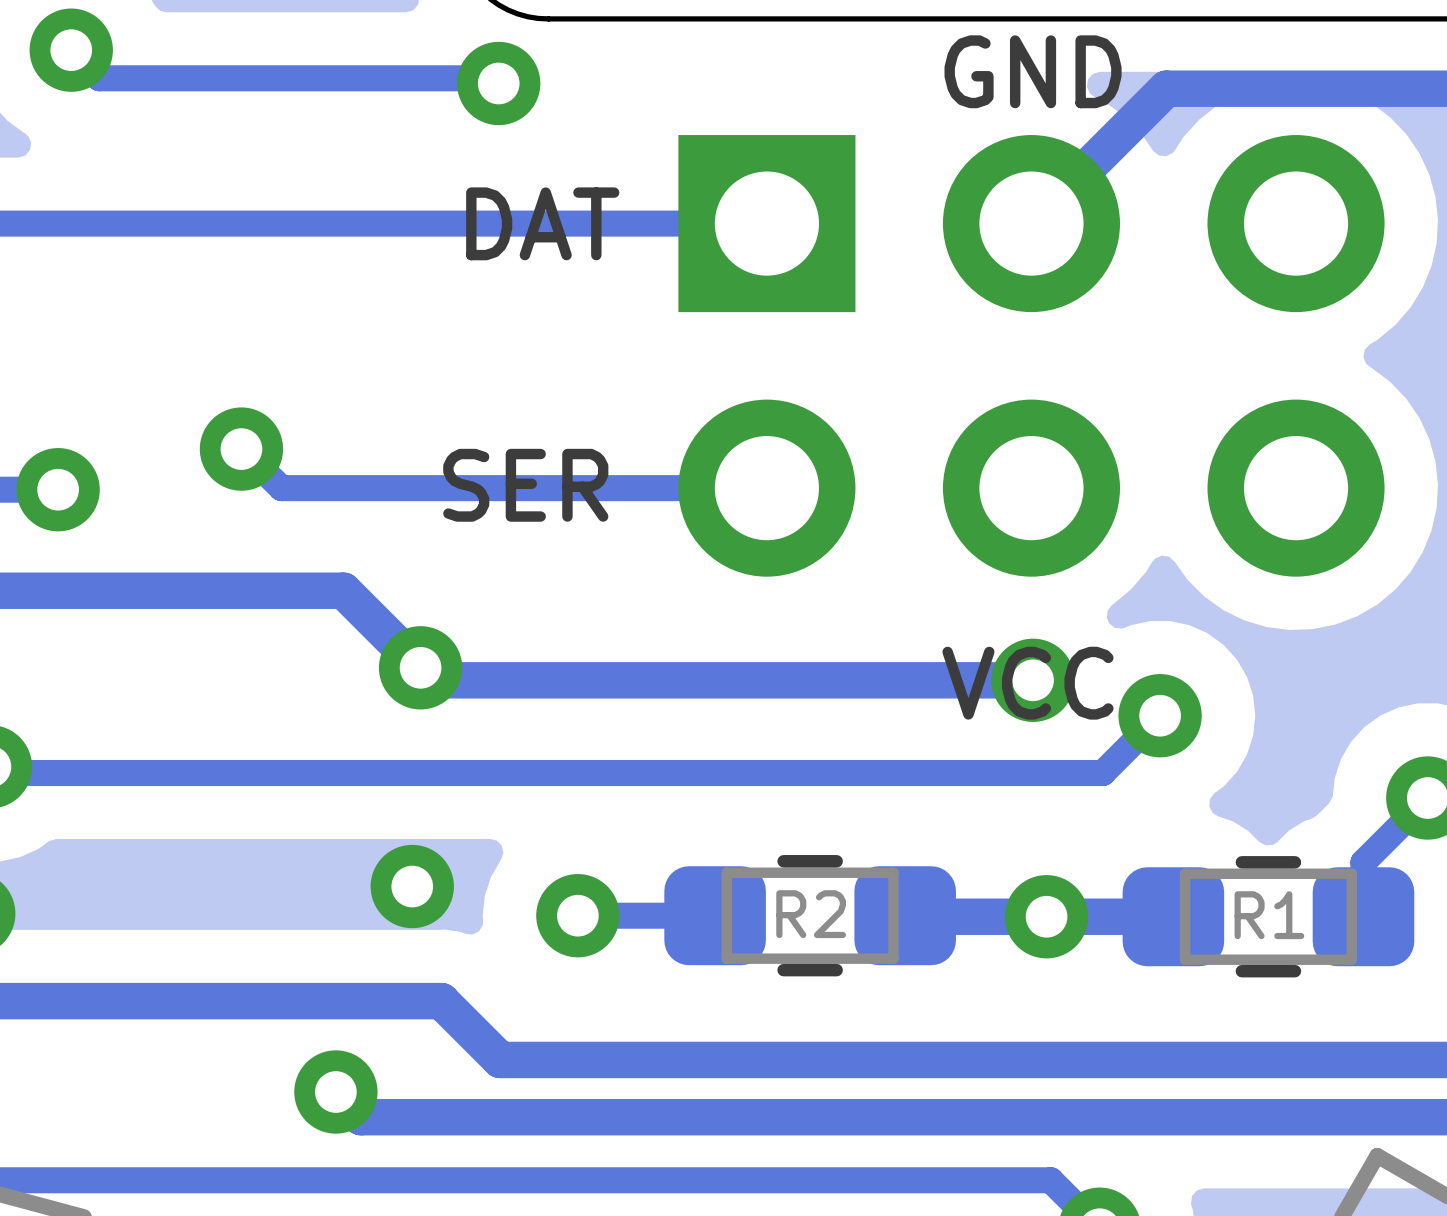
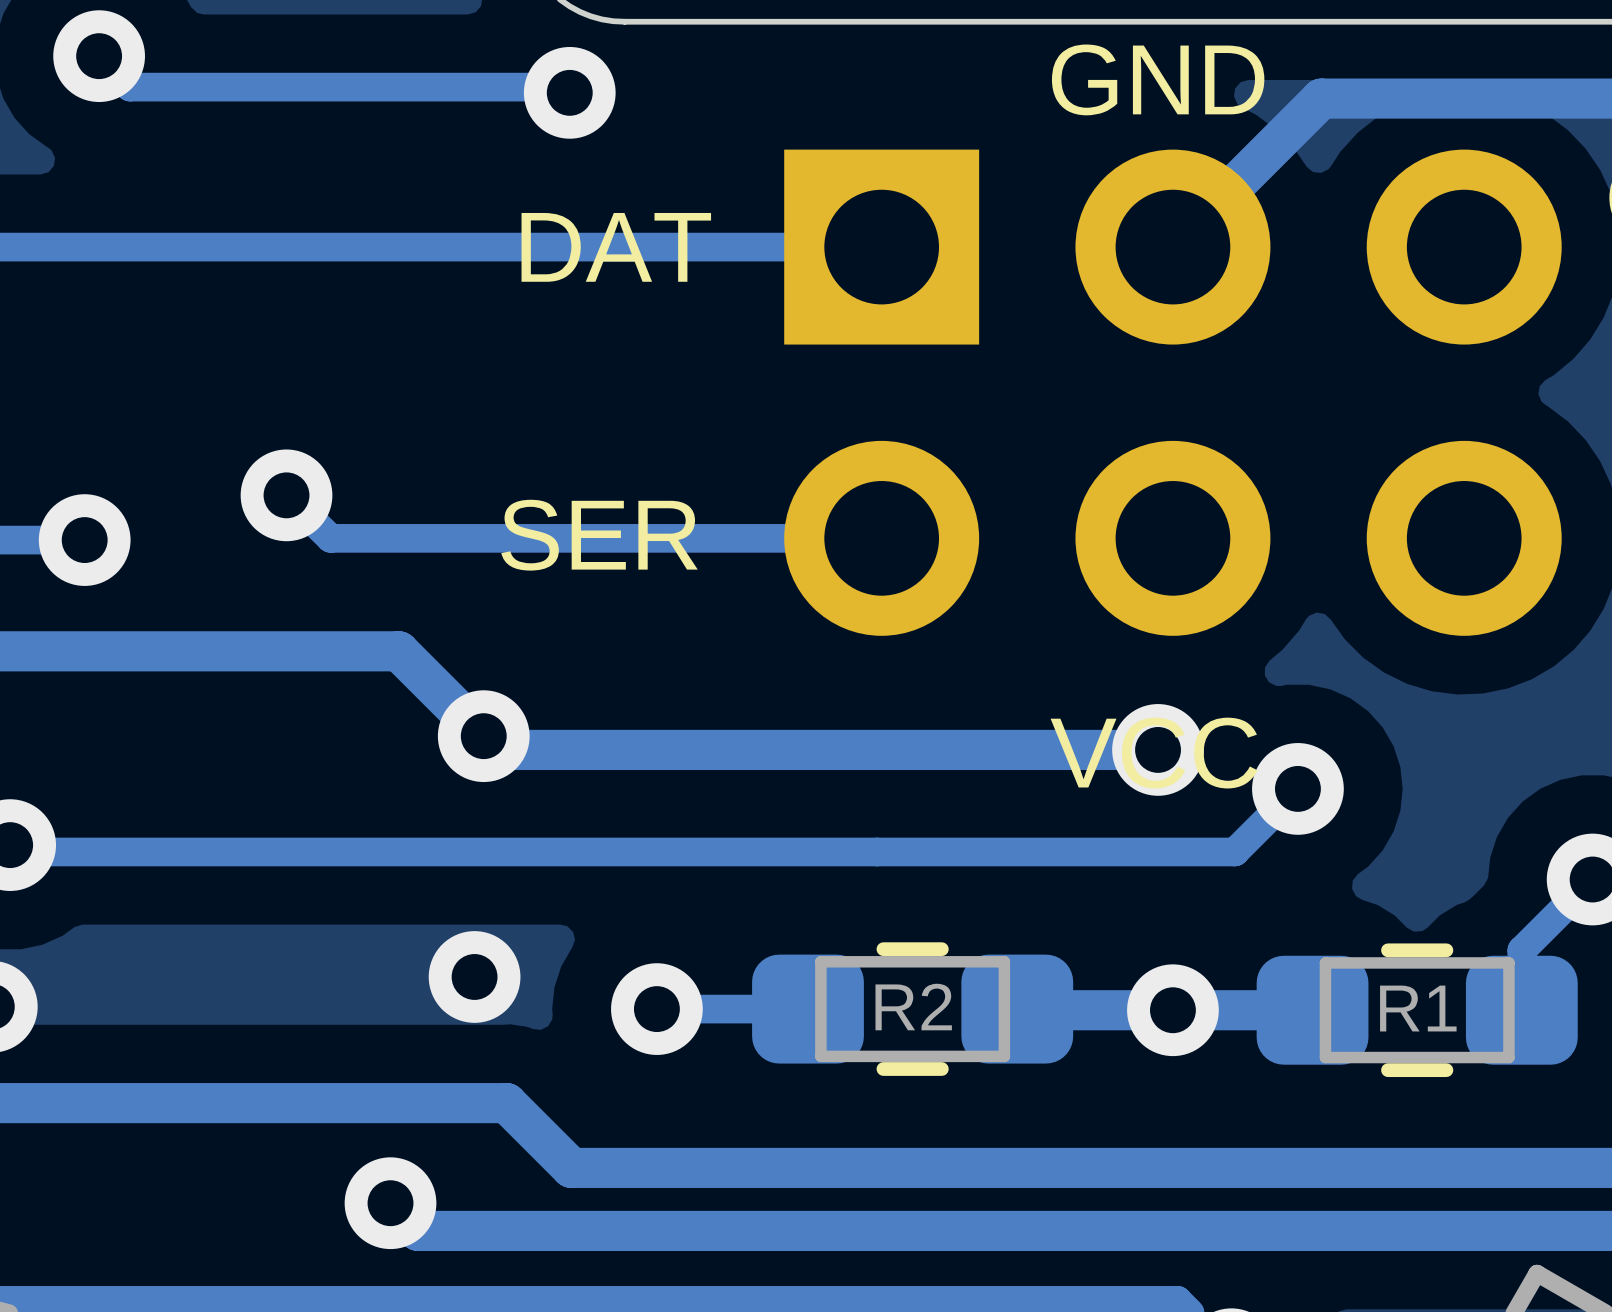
track: (1181, 88) (1166, 88) (1031, 223) -> (1321, 98) (1172, 247)
part position: (1031, 355) -> (1172, 392)

